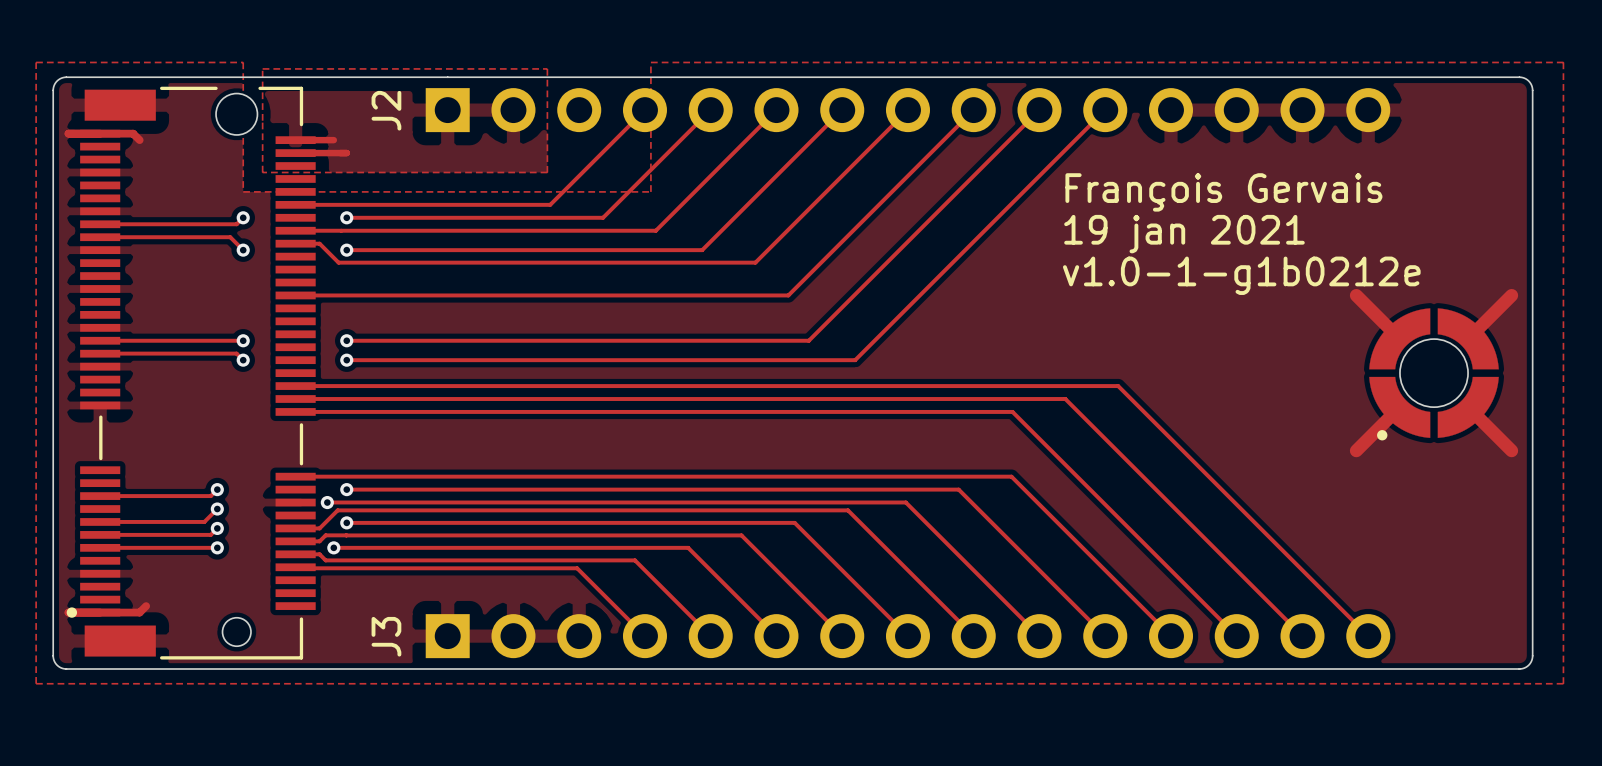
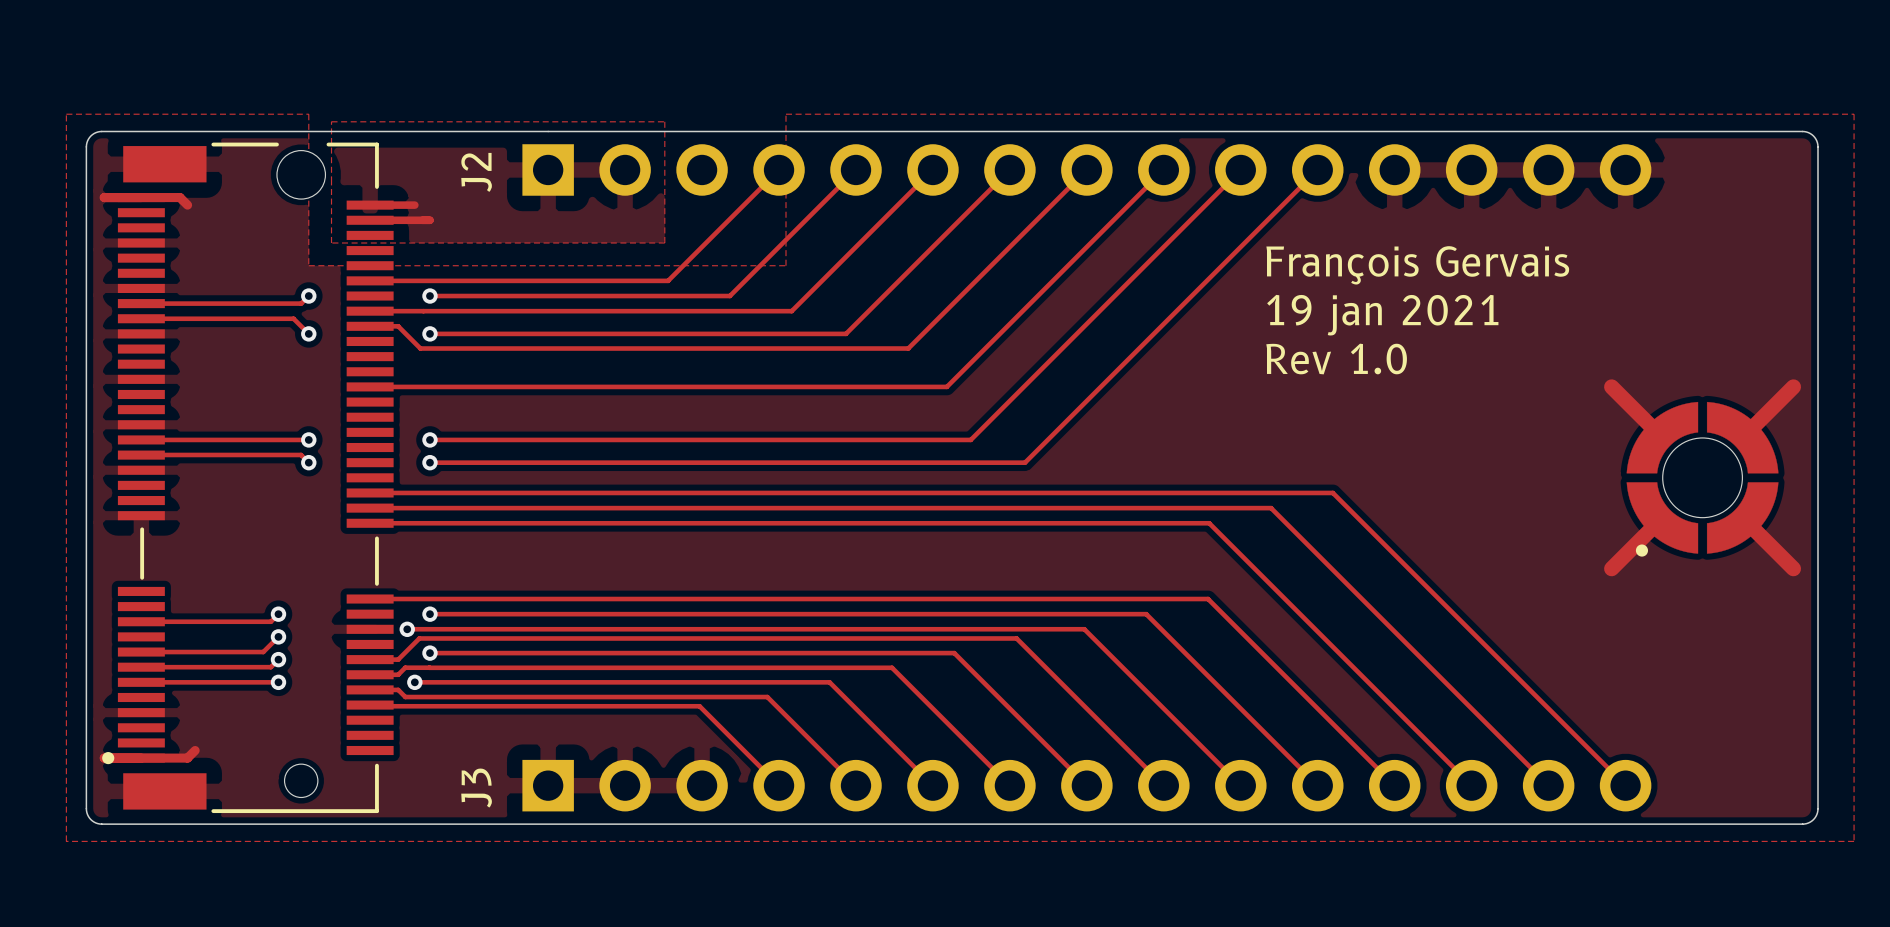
text: v1.0-1-g1b0212e (1241, 275) -> Rev 1.0 (1336, 359)

